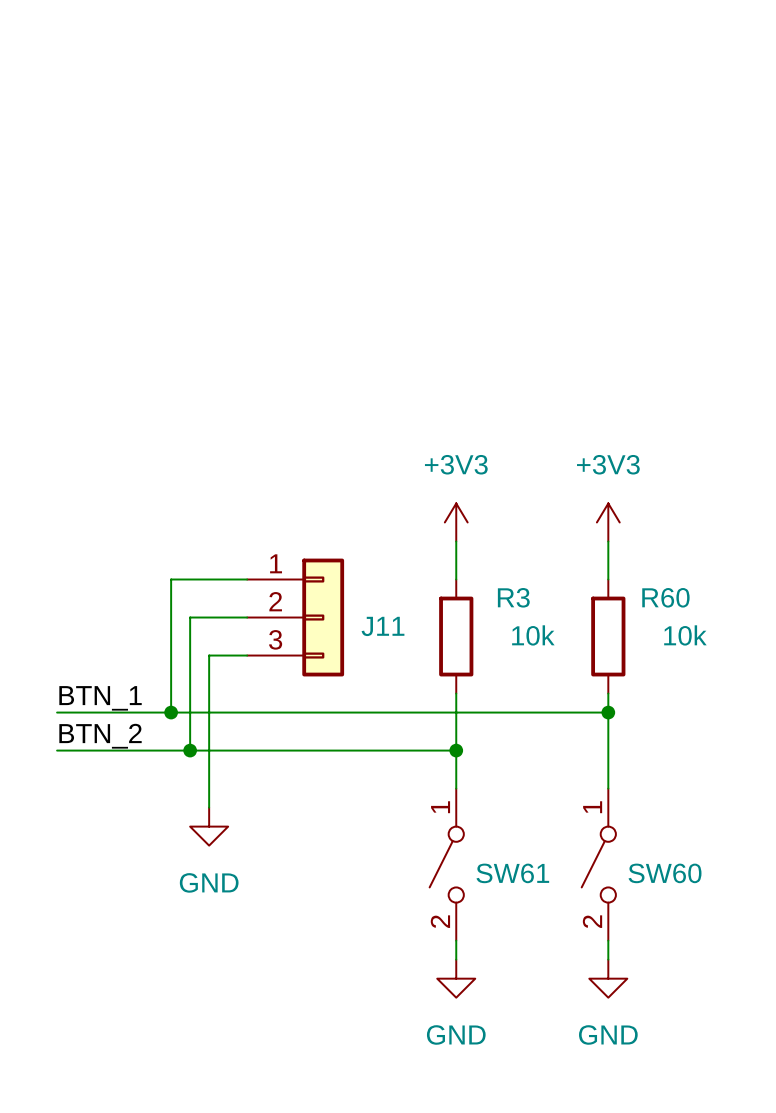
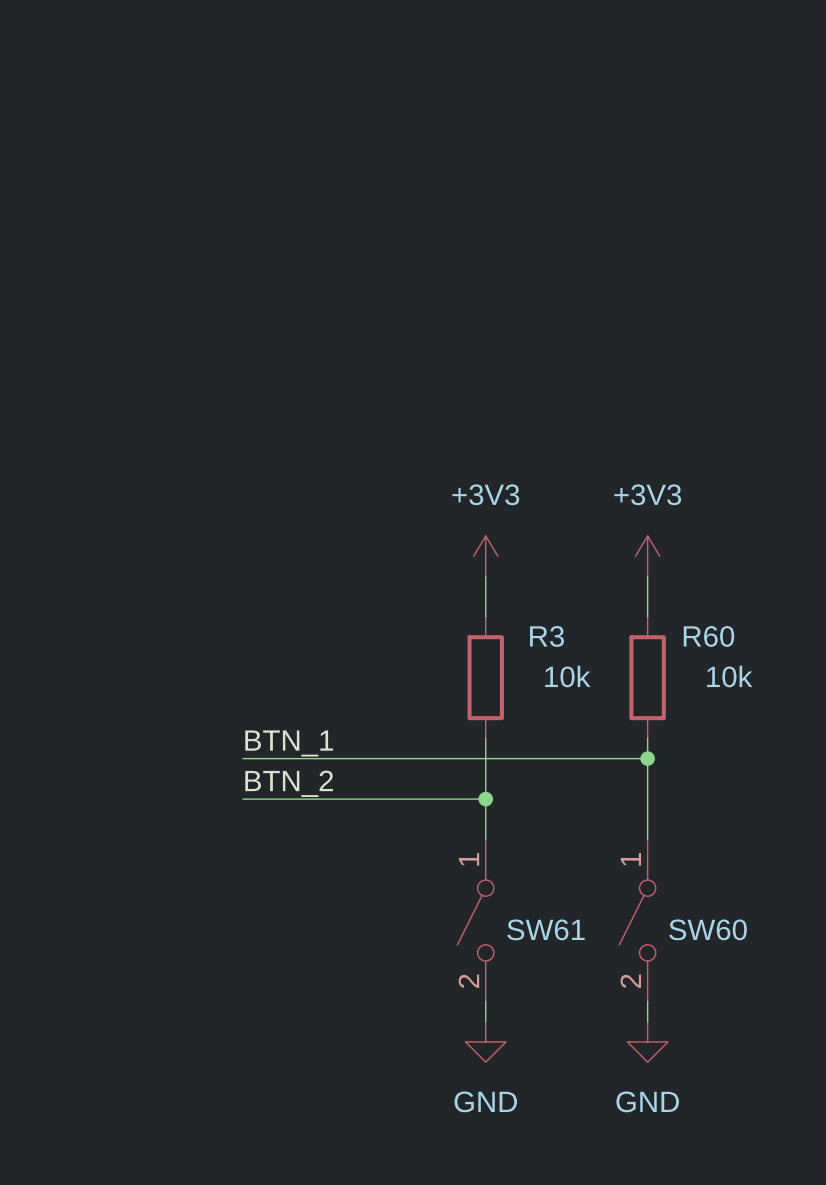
wire: (247, 579) (171, 579) (171, 712) -> none
wire: (247, 617) (190, 617) (190, 750) -> none
J11: (295, 617) -> none
wire: (247, 655) (209, 655) (209, 807) -> none
label position: BTN_1 (100, 698) -> BTN_1 (289, 743)
wire: (57, 712) (228, 712) -> none
junction: (171, 712) -> none
label position: BTN_2 (100, 736) -> BTN_2 (289, 783)
wire: (57, 750) (228, 750) -> none
junction: (190, 750) -> none
power symbol: GND (209, 826) -> none

